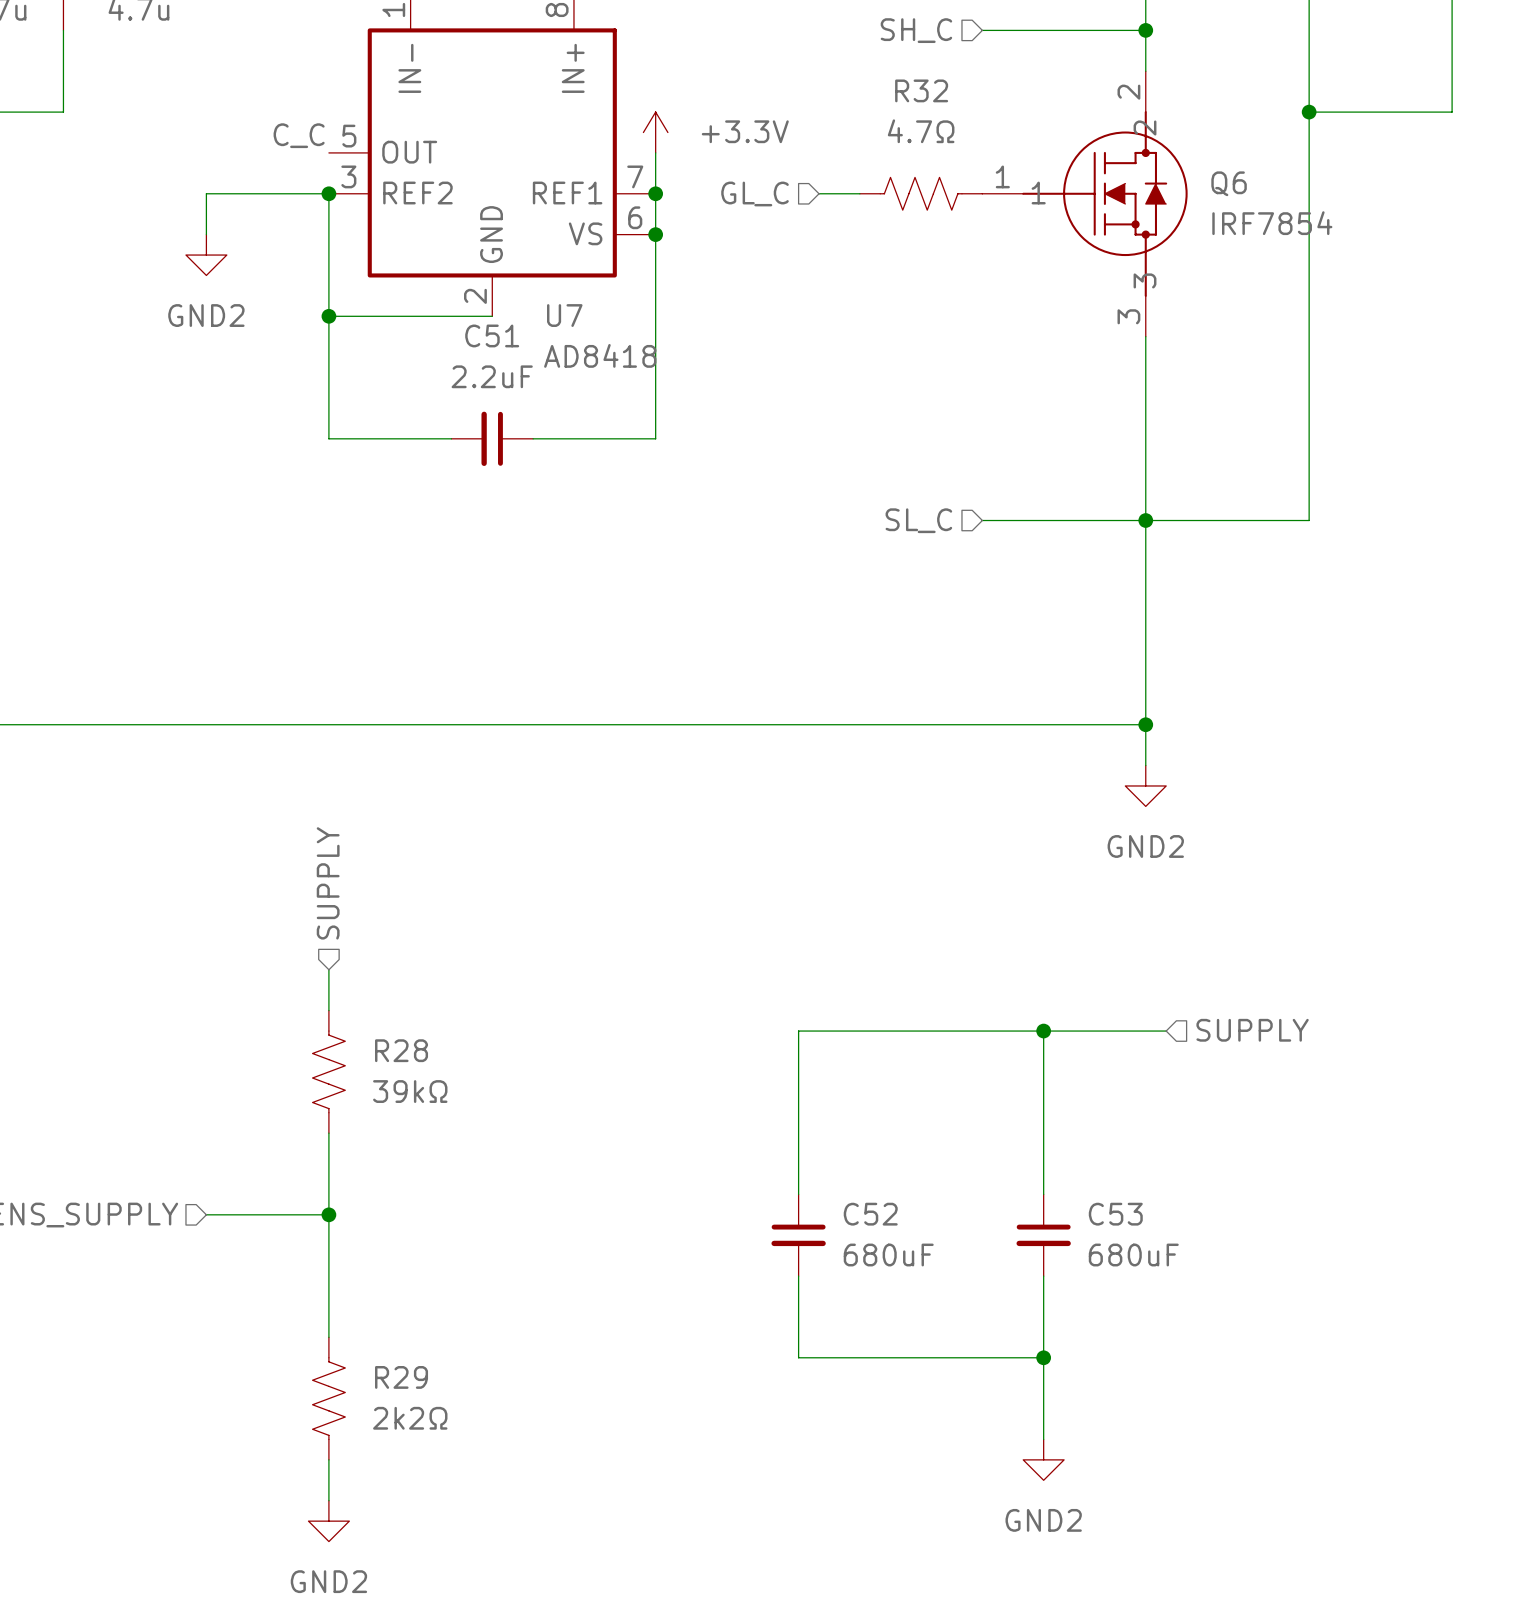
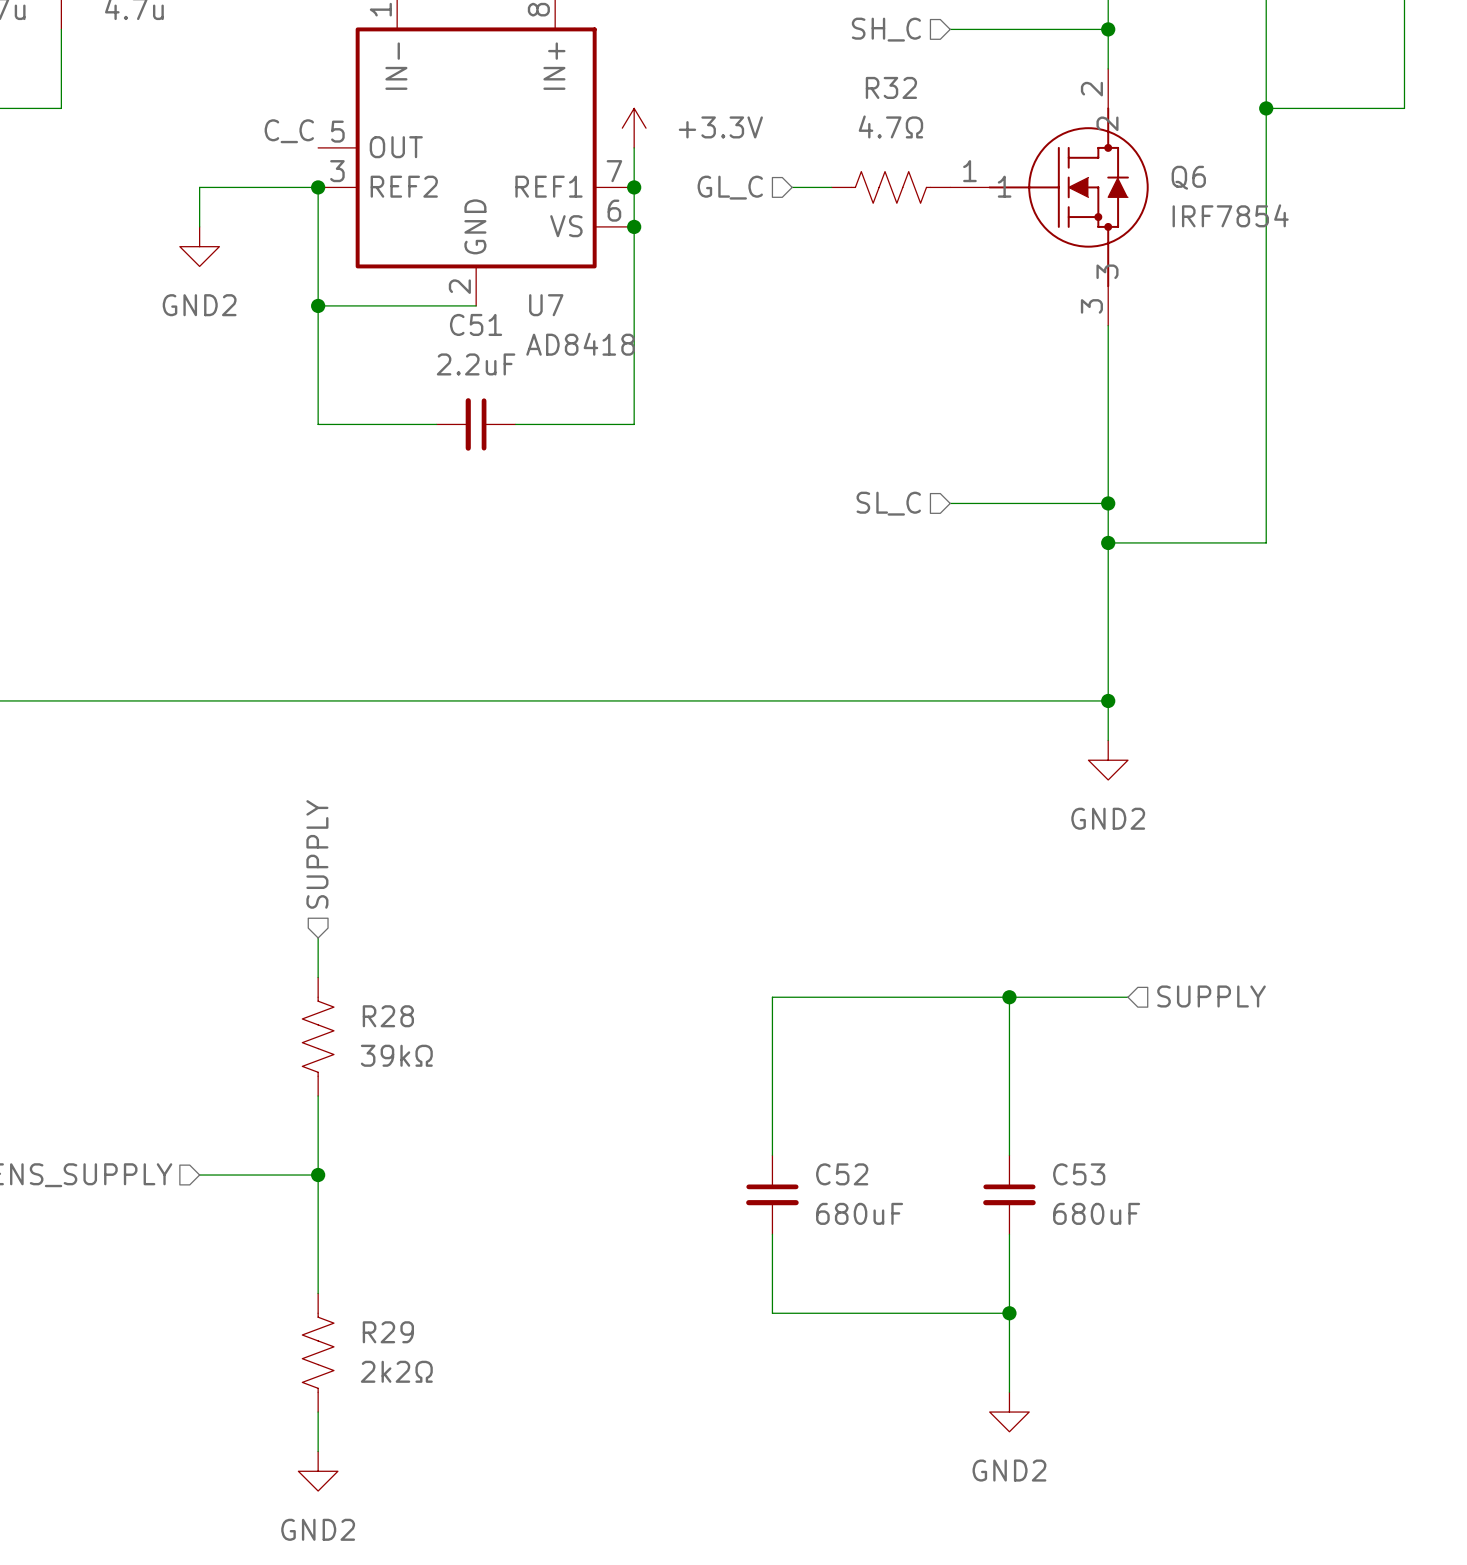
wire: (1145, 520) (1309, 520) -> (1108, 542) (1266, 542) (1266, 503)
junction: none -> (1108, 542)

